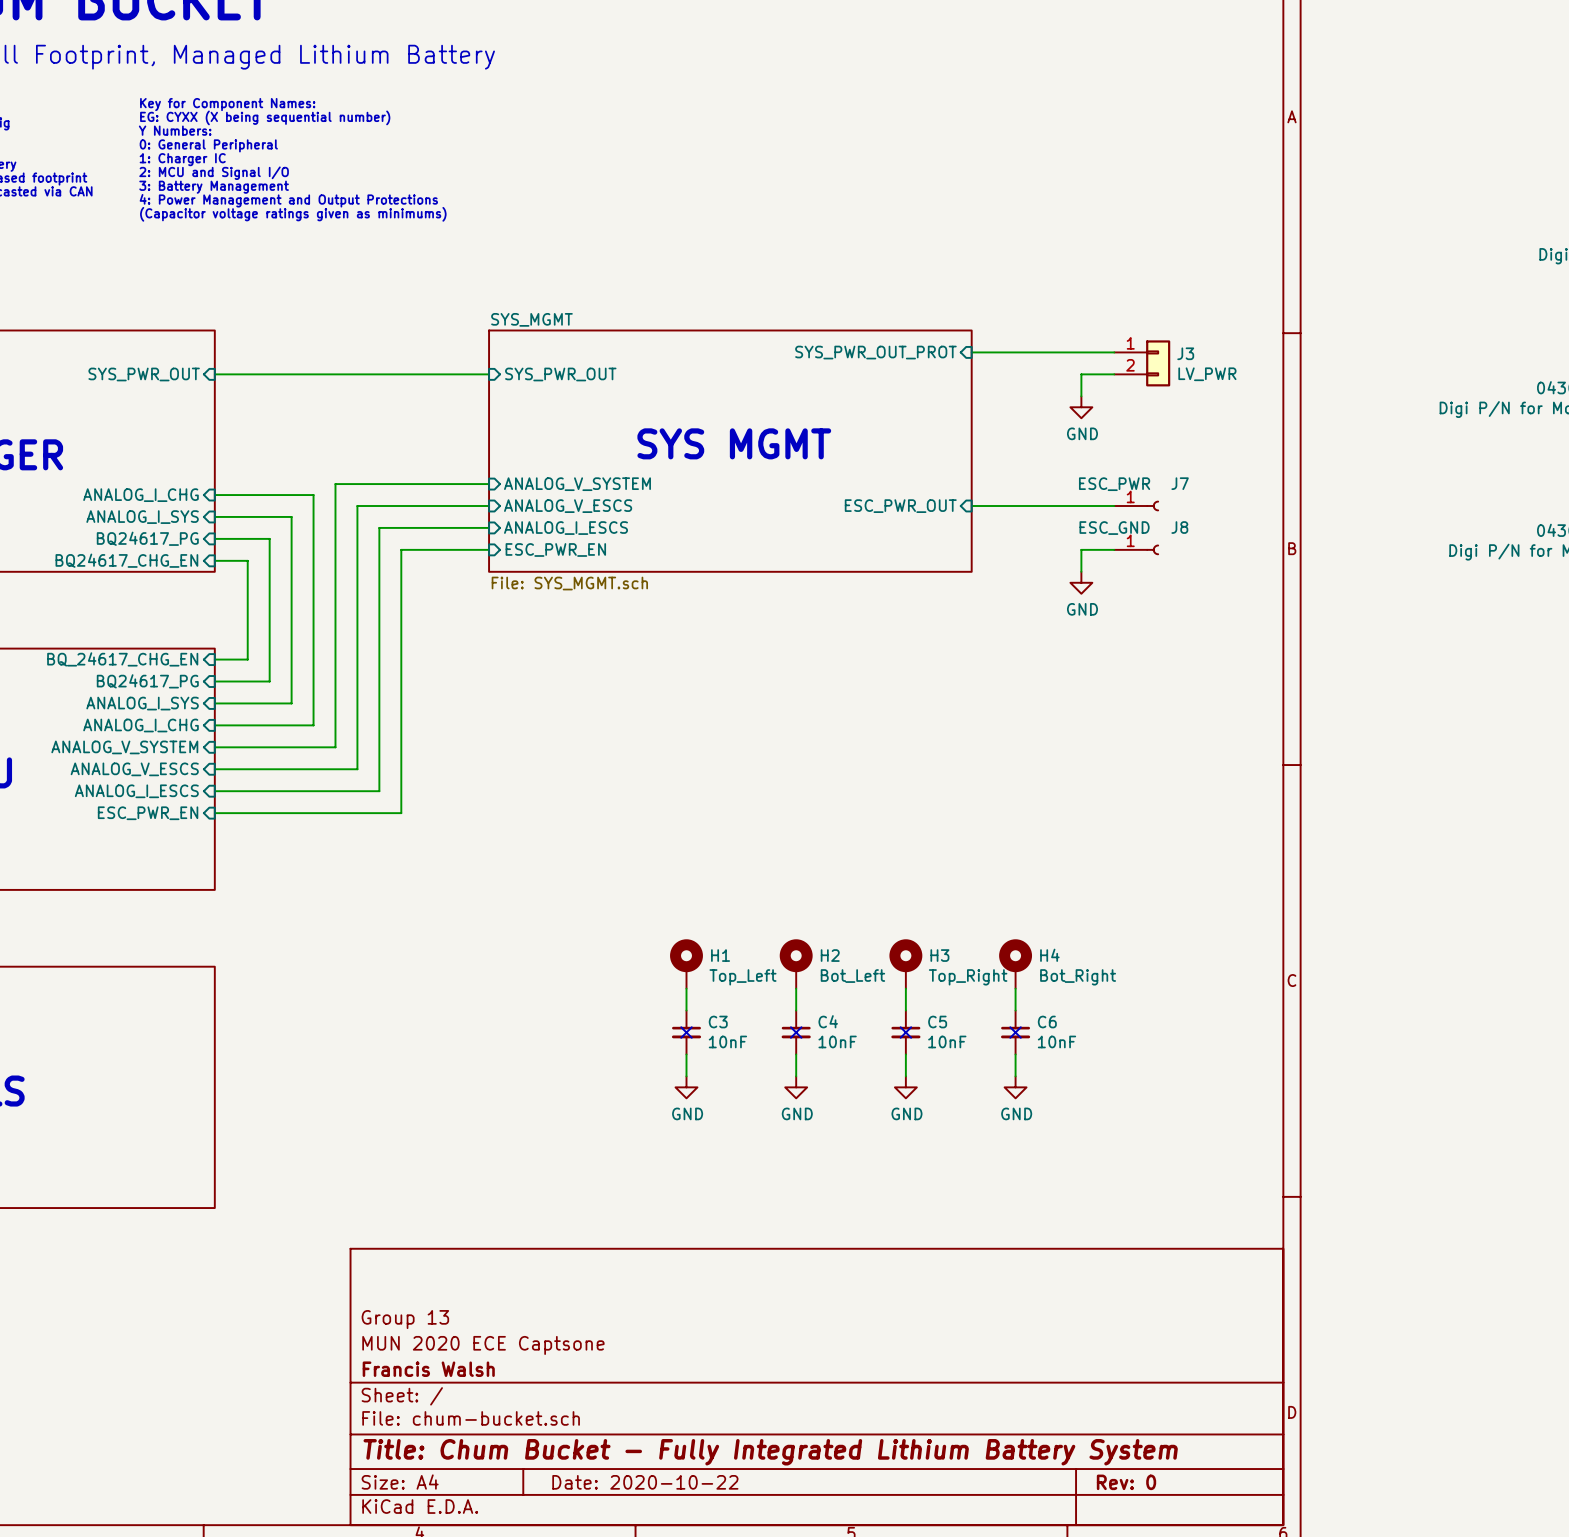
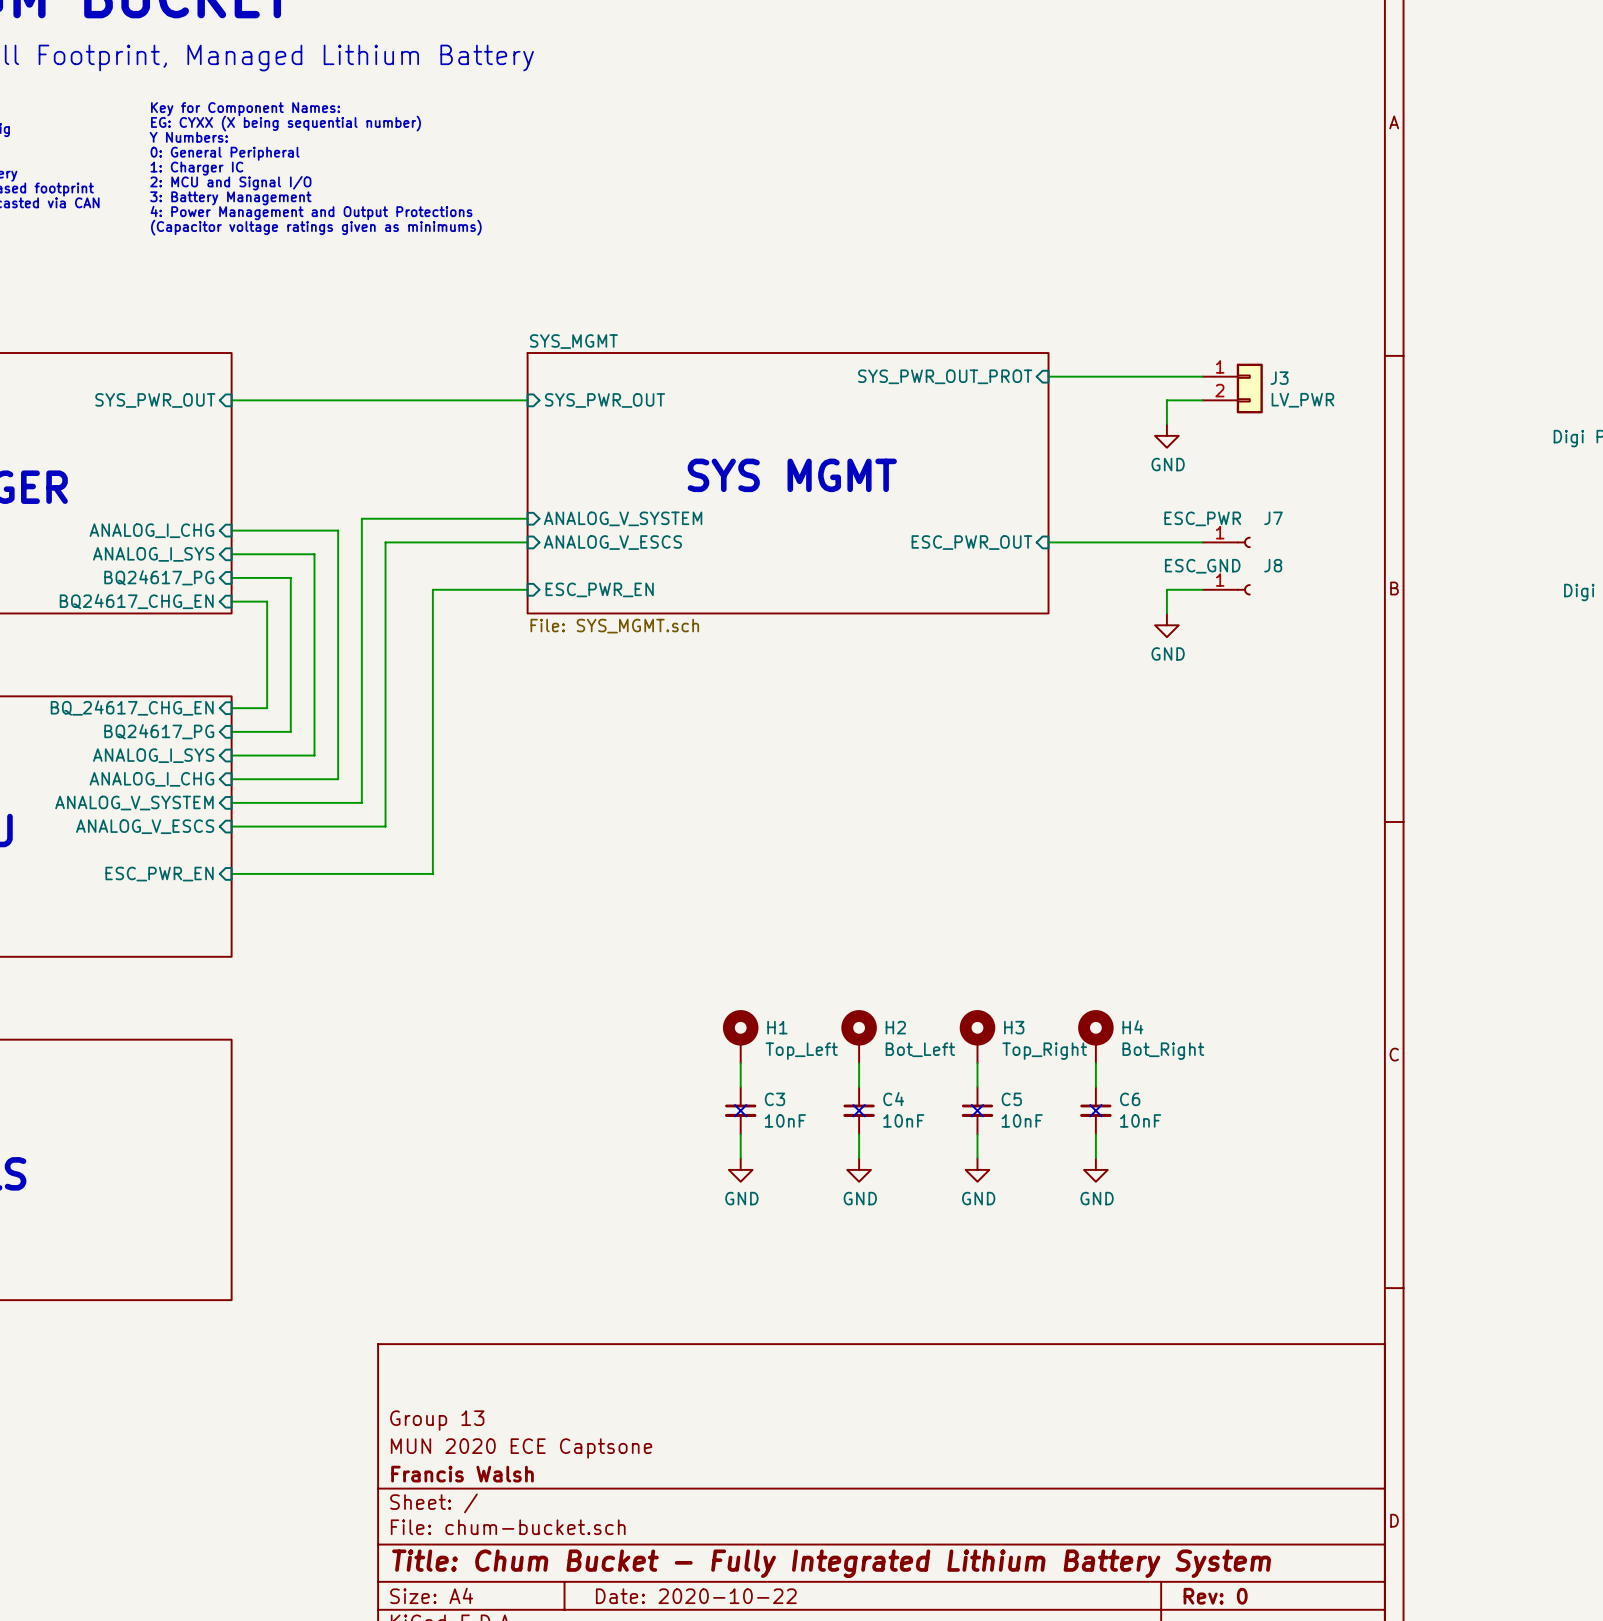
wire: (489, 527) (379, 527) (379, 791) (214, 791) -> none
sheet pin: ANALOG_I_ESCS (566, 528) -> none
sheet pin: ANALOG_I_ESCS (136, 791) -> none

